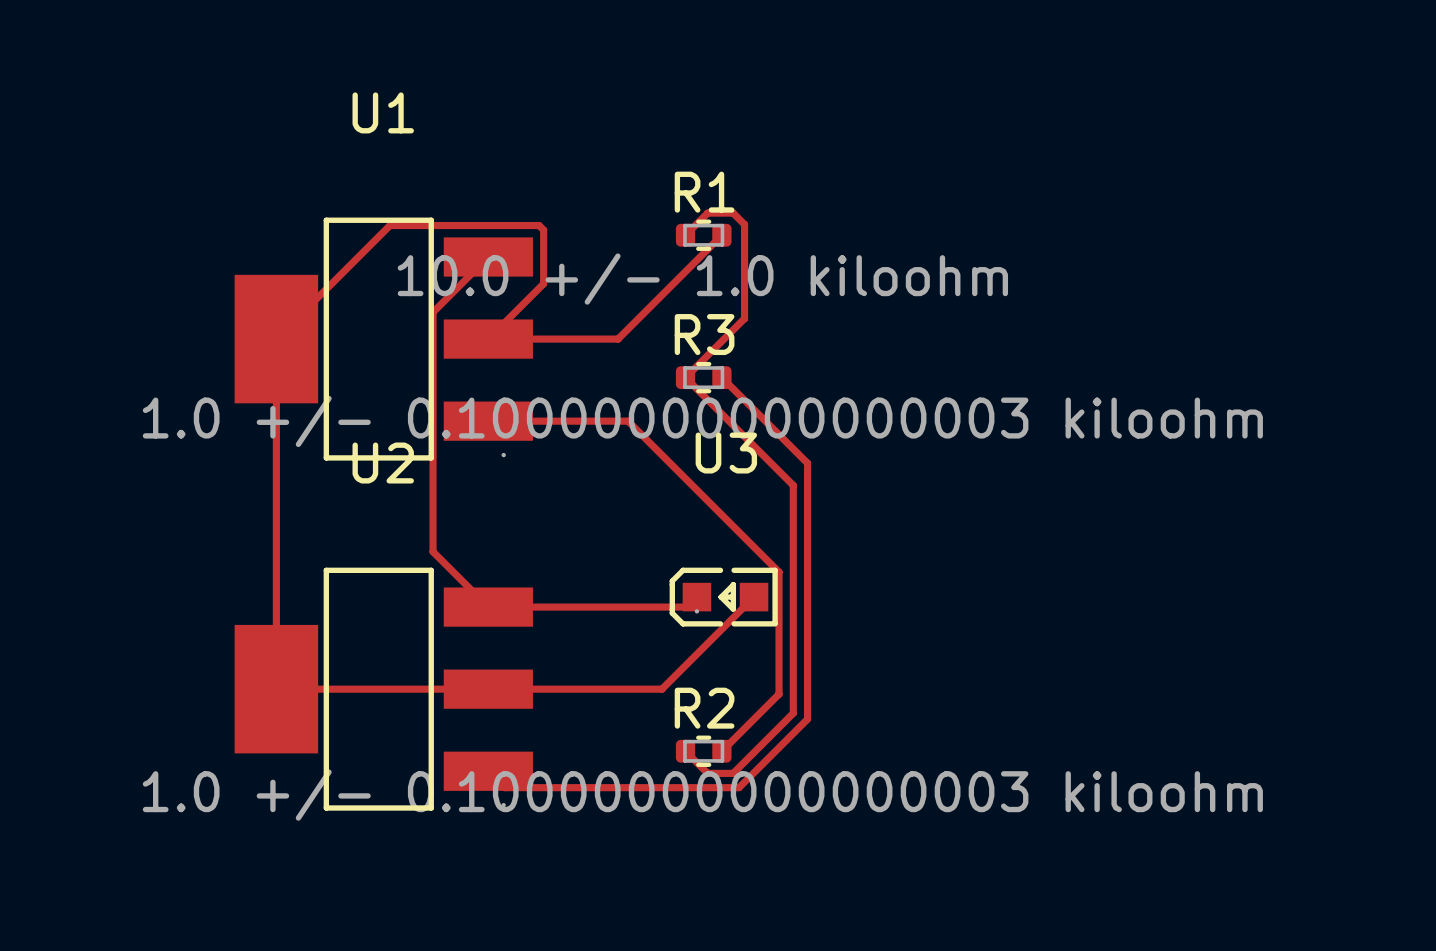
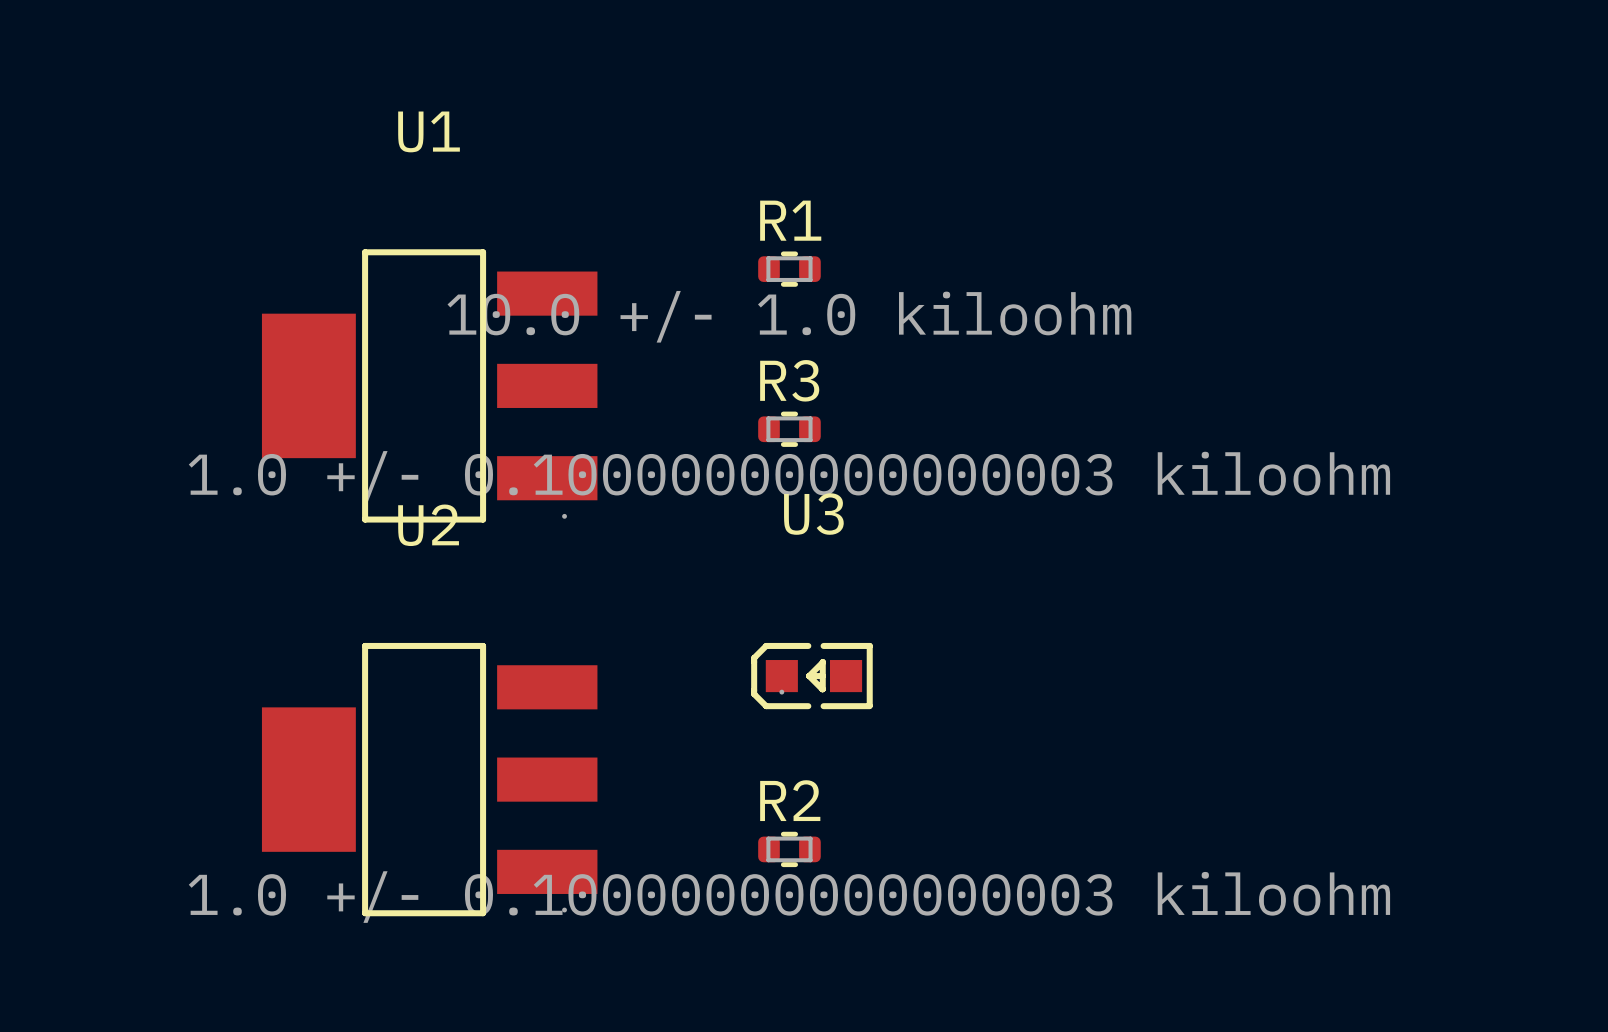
track: (685, 235) (707, 213) (733, 213) (744, 224) (744, 318) (685, 377) (793, 485) (793, 713) (733, 773) (707, 773) (685, 751) -> none
track: (721, 235) (618, 339) (488, 339) (543, 283) (543, 230) (539, 225) (389, 225) (276, 339) (276, 689) (661, 689) (754, 597) -> none
track: (488, 257) (433, 312) (433, 551) (488, 607) (686, 607) (696, 597) -> none
track: (721, 377) (807, 463) (807, 719) (739, 787) (504, 787) (488, 771) -> none
track: (488, 421) (628, 421) (779, 572) (779, 694) (721, 751) -> none

